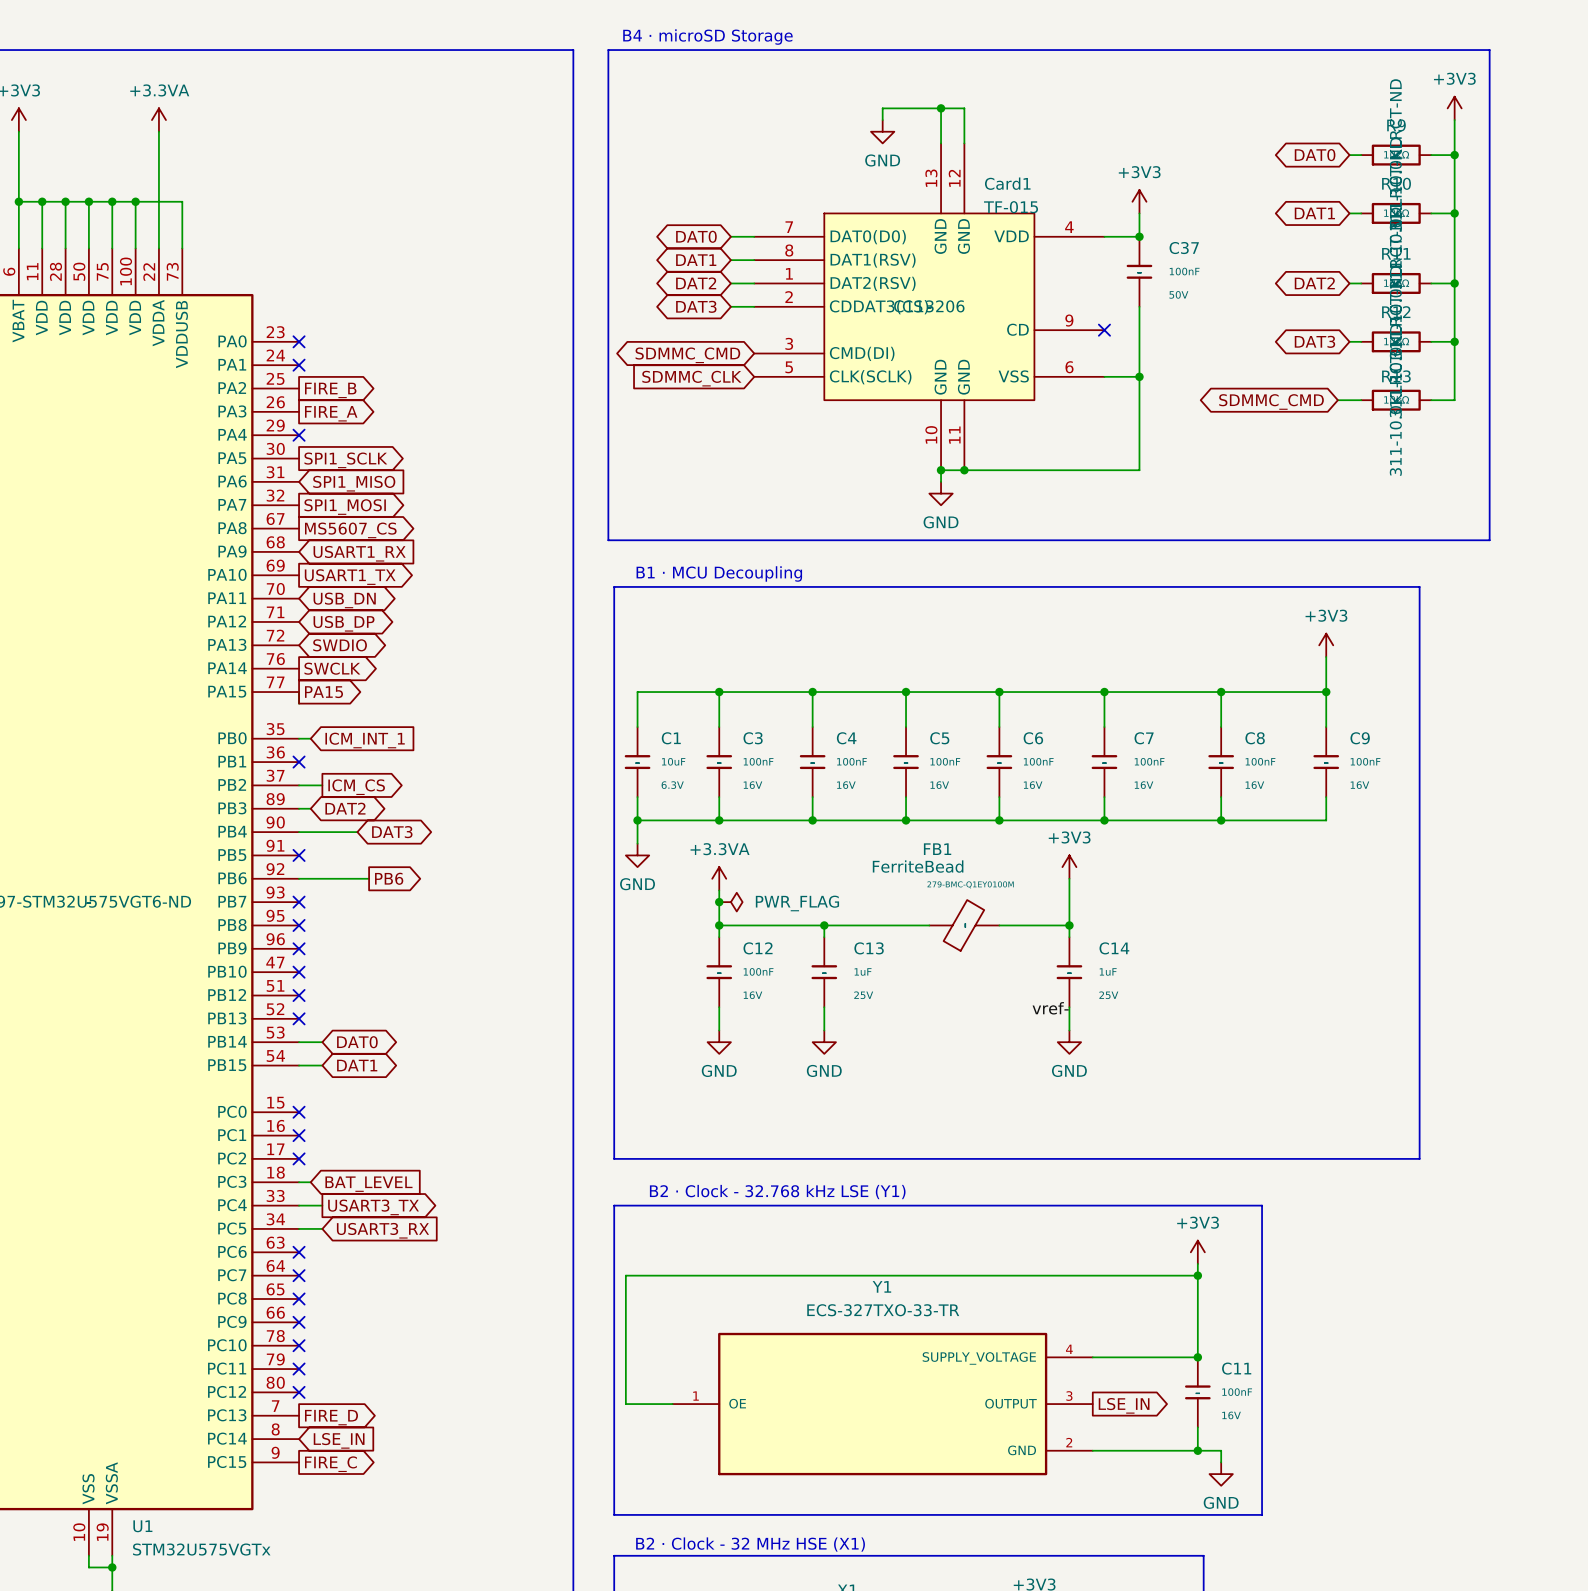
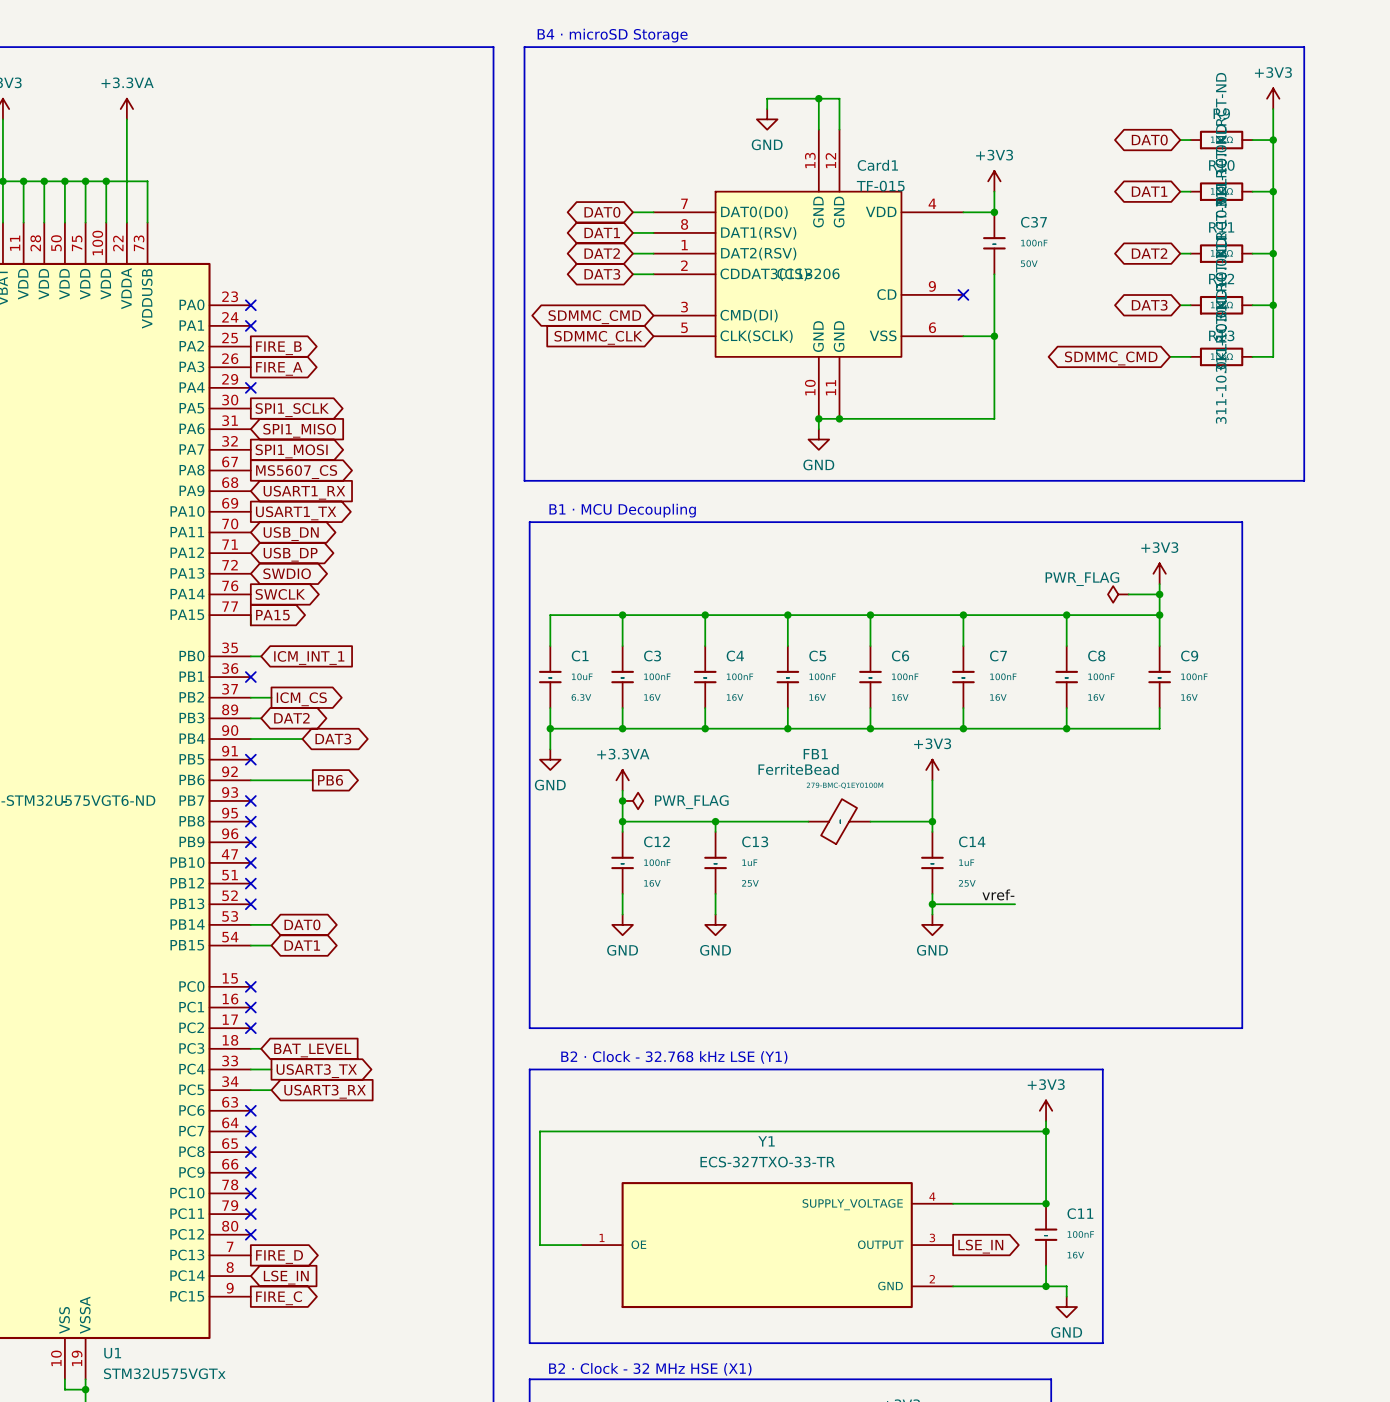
power symbol: none -> PWR_FLAG (1118, 594)
wire: none -> (1128, 594) (1159, 594)
junction: none -> (1159, 594)
label position: vref- (1050, 1008) -> vref- (998, 894)
wire: none -> (932, 904) (1015, 904)
junction: none -> (932, 904)

